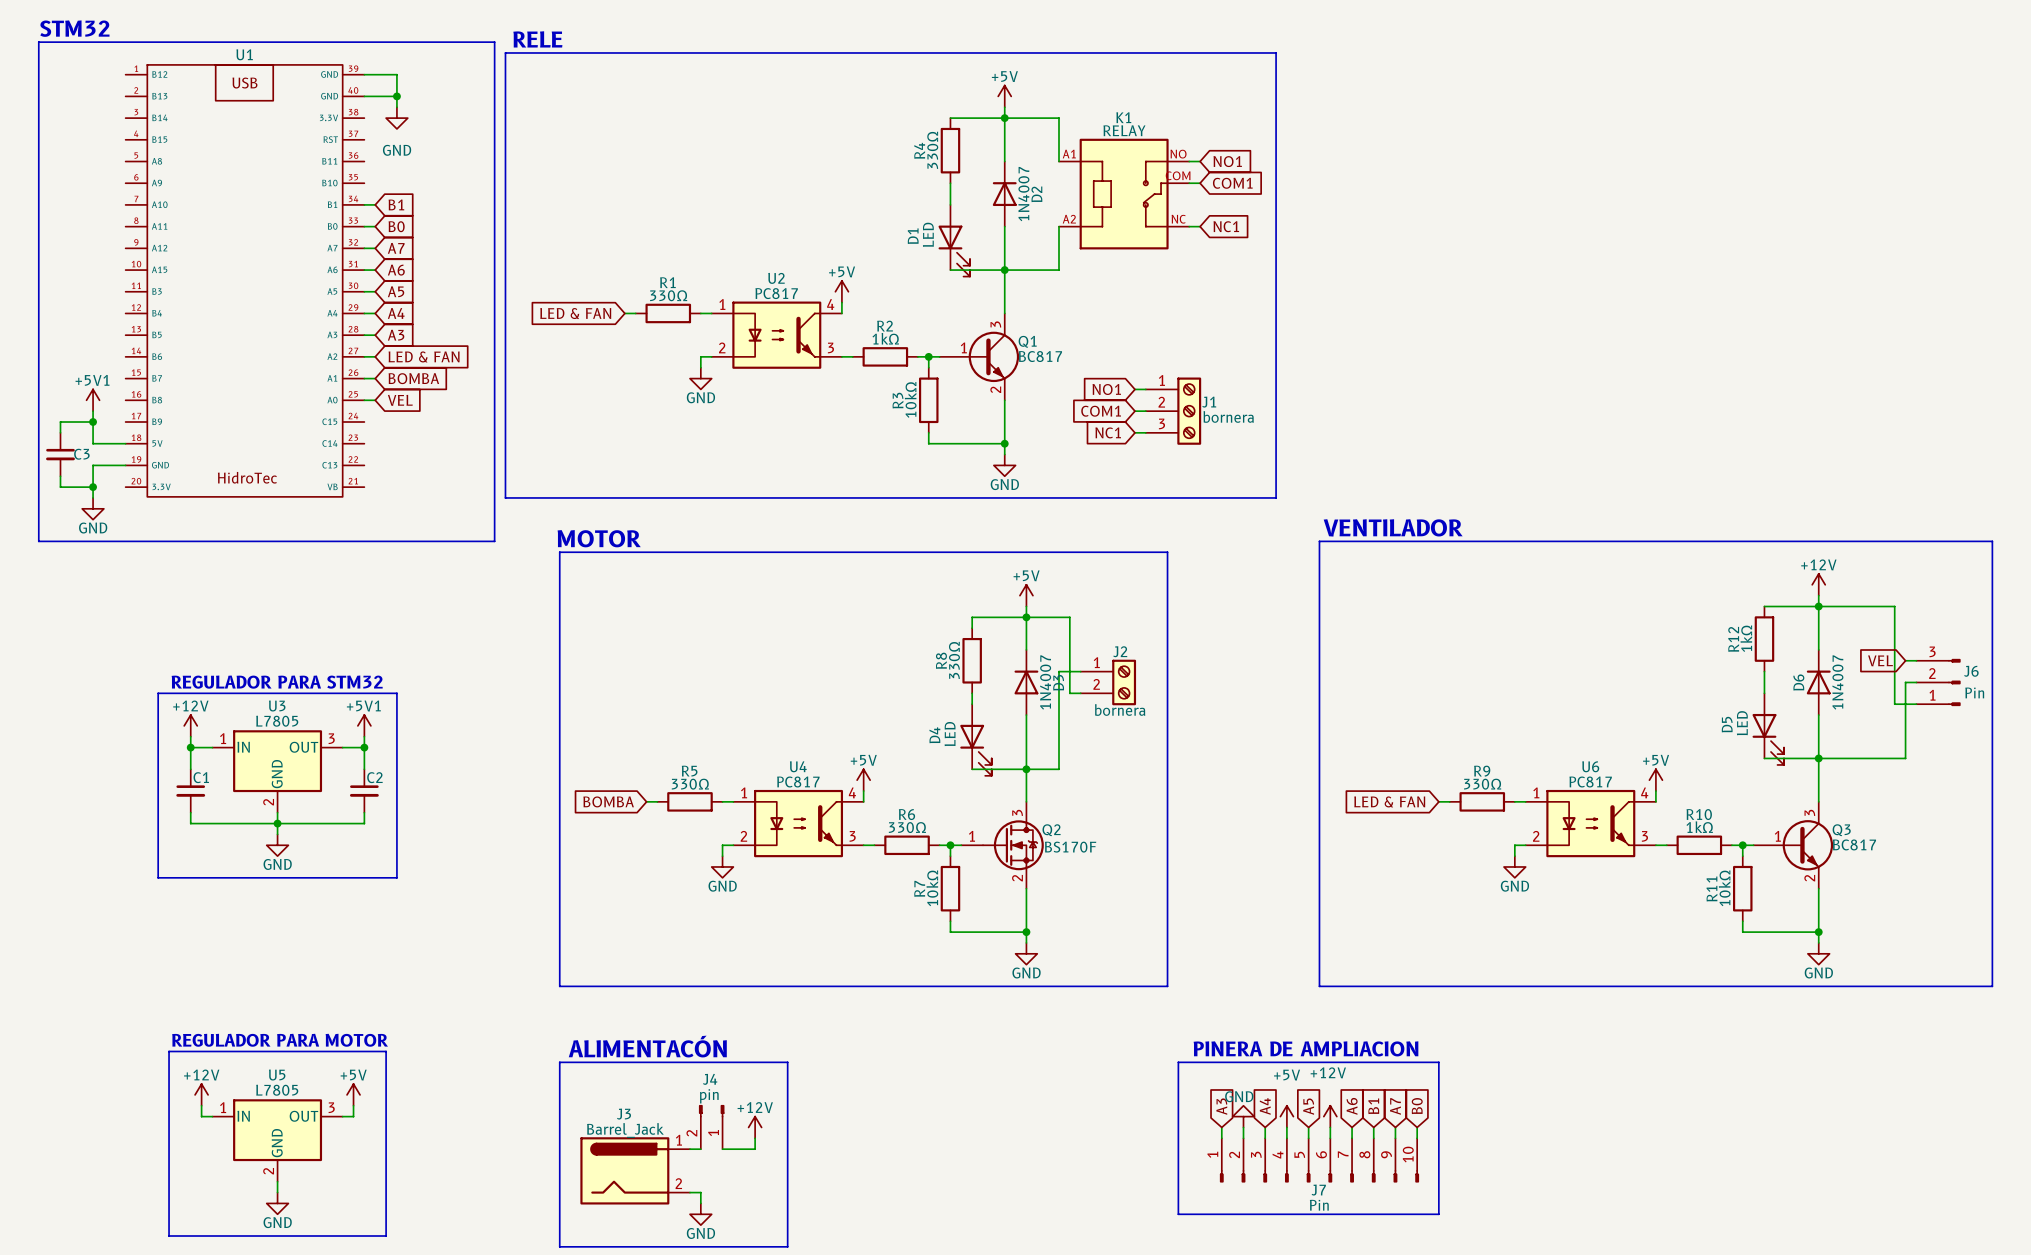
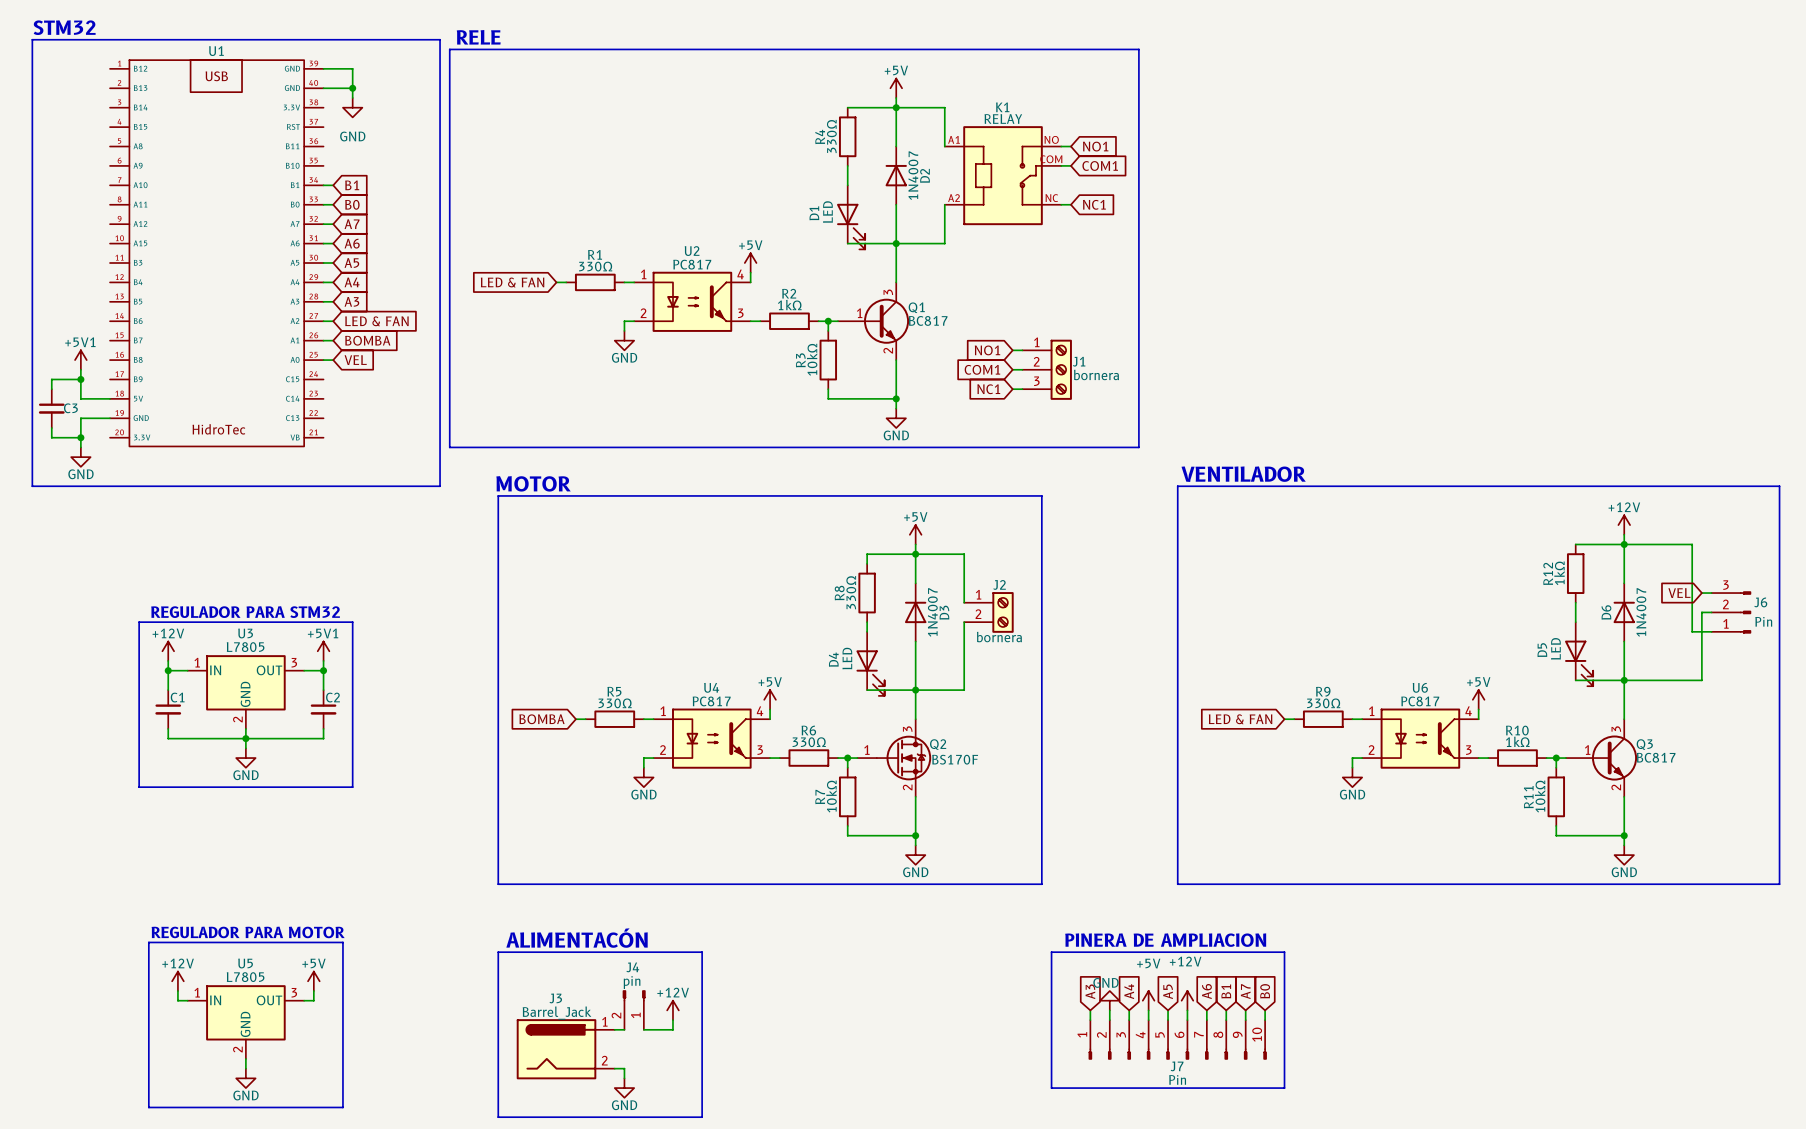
wire: (1069, 617) (1069, 693) (1080, 693) -> (954, 554) (964, 554) (964, 602)
wire: (1080, 671) (1059, 671) (1059, 769) -> (964, 622) (964, 690) (944, 690)

